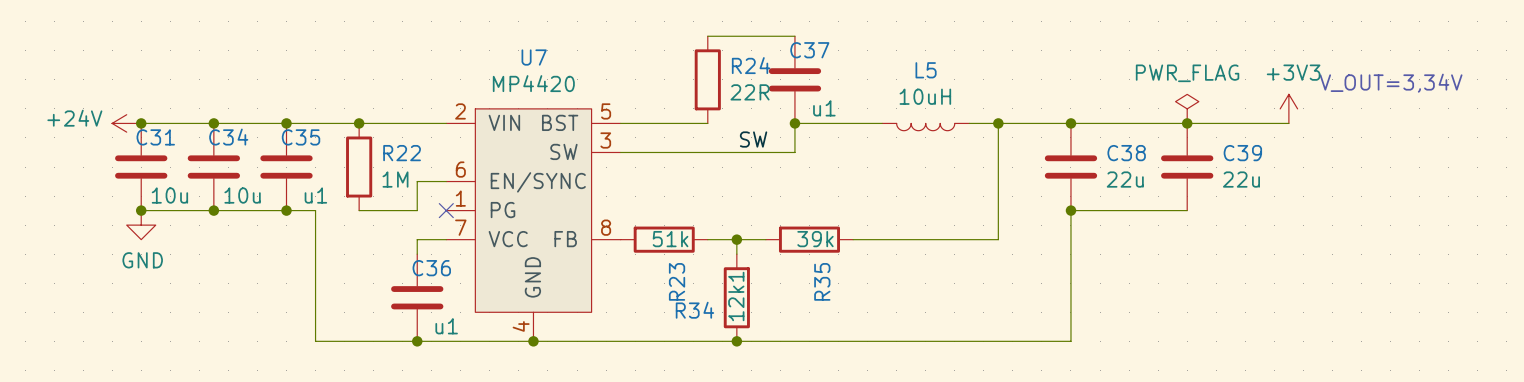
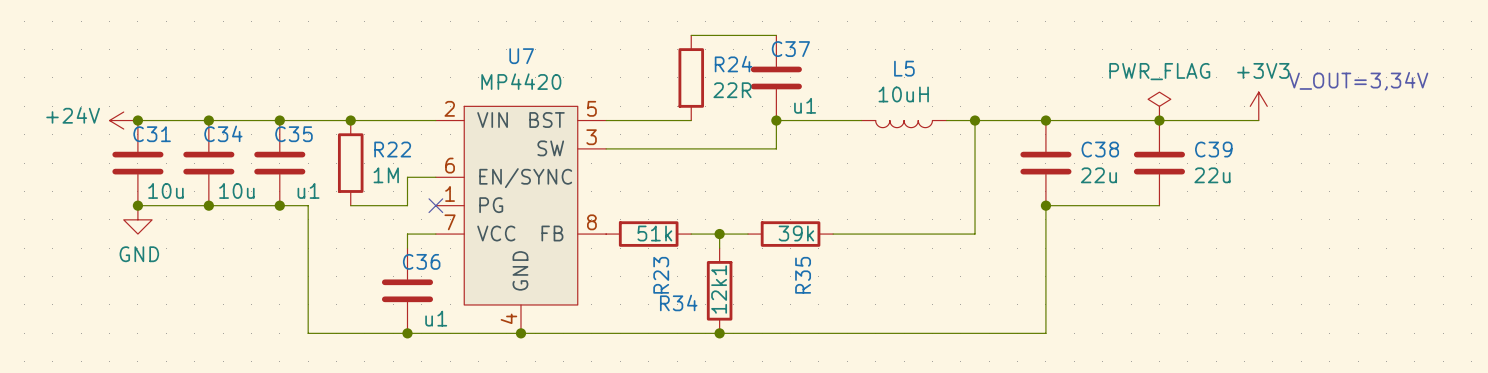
label: SW (753, 139) -> none

